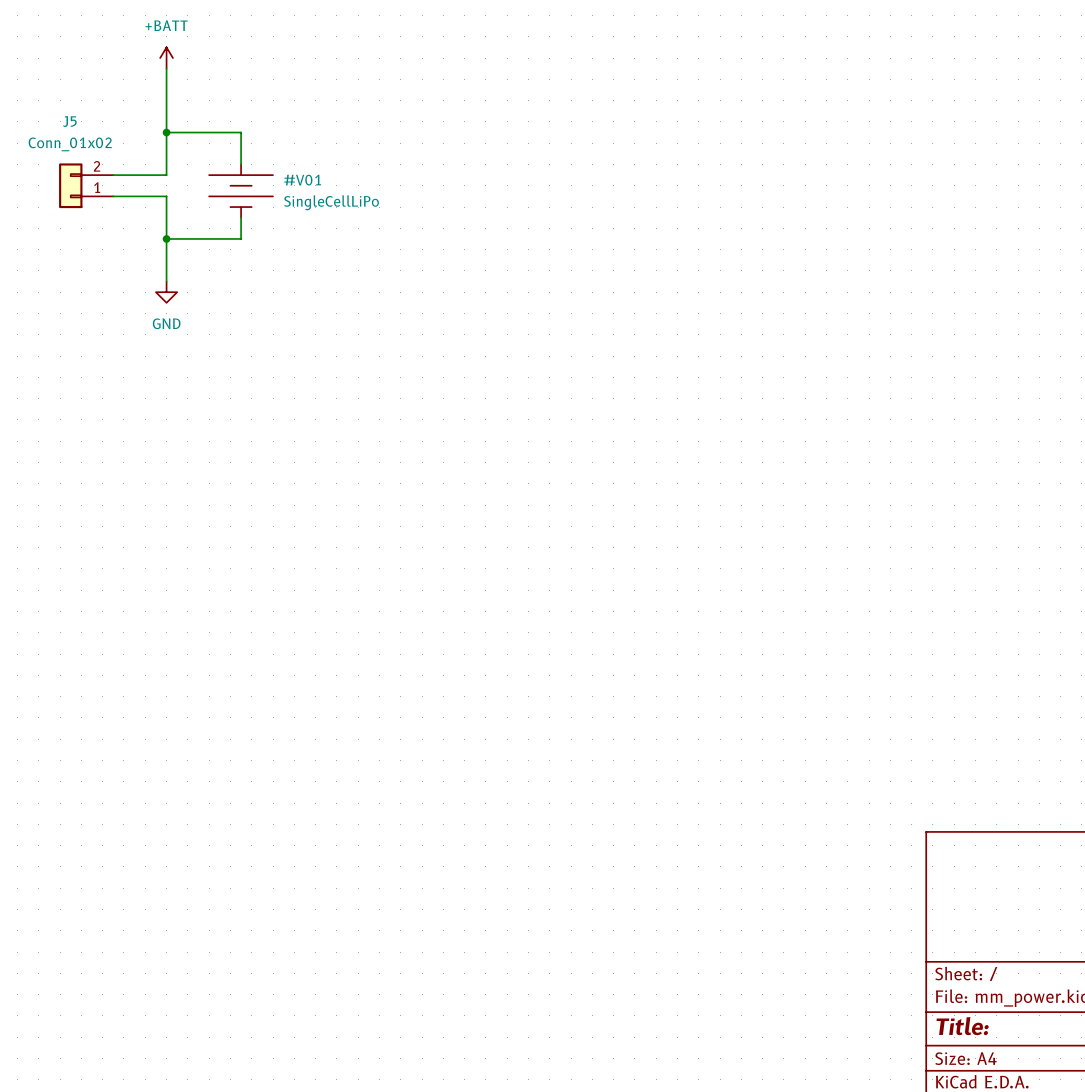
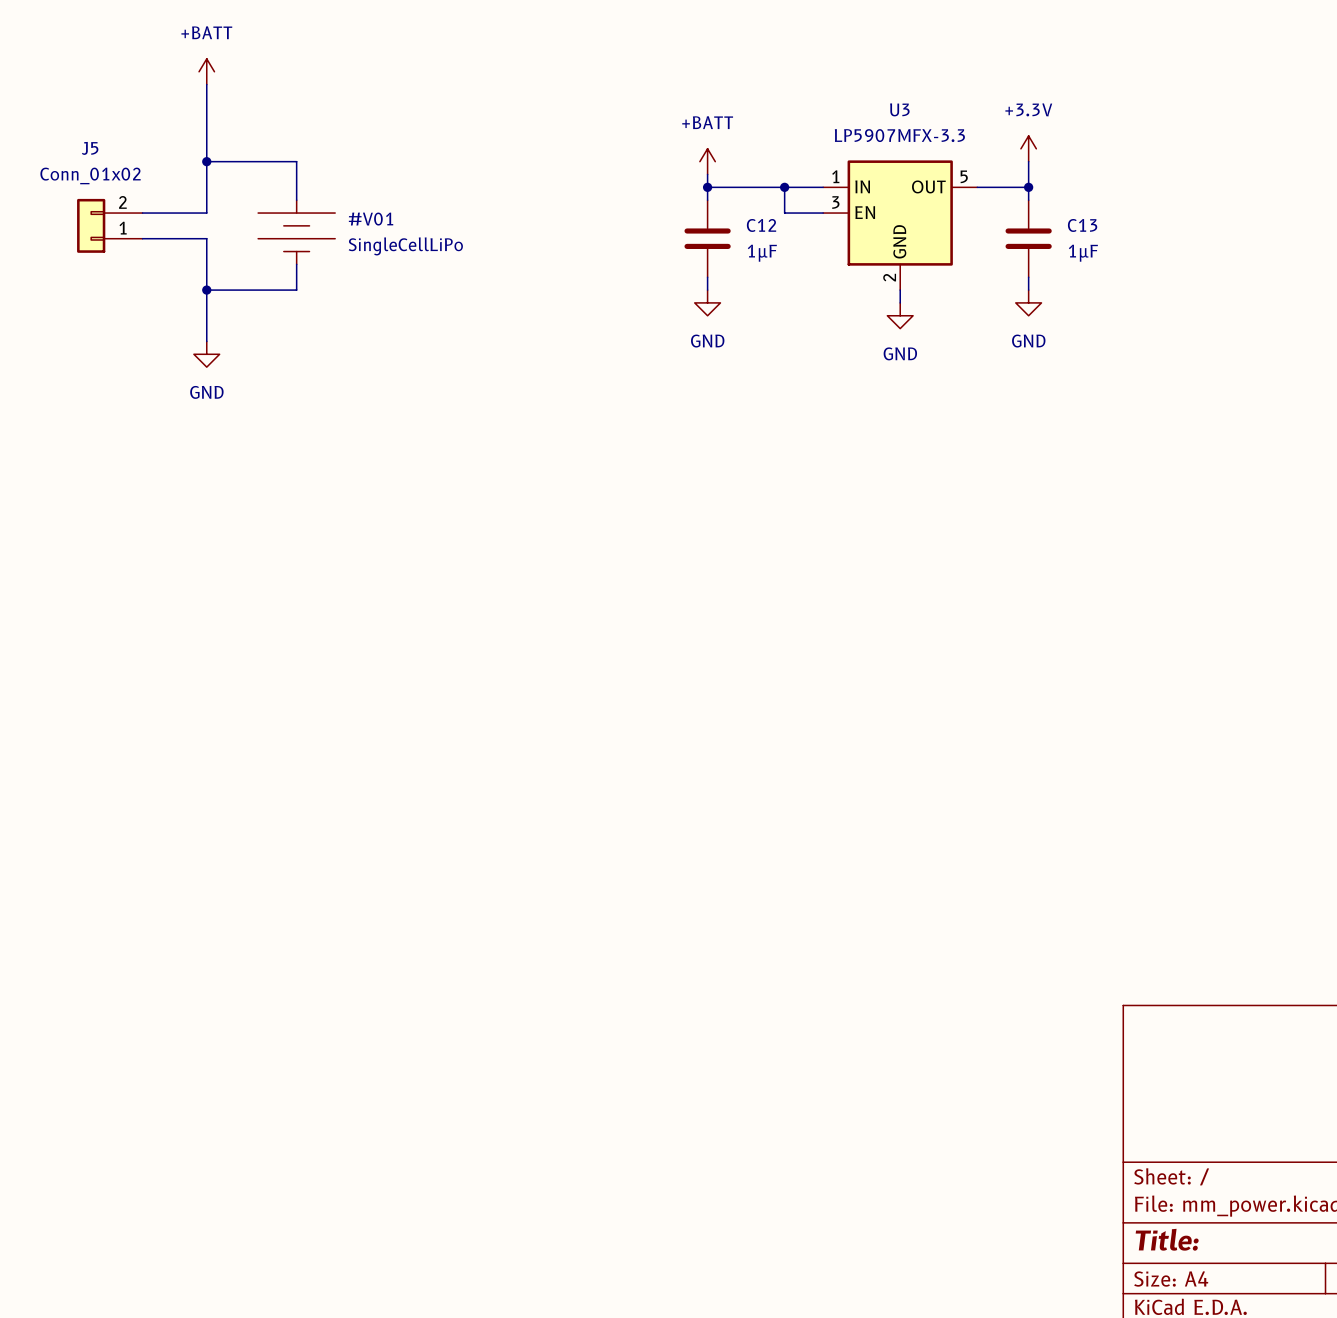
power symbol: none -> +3.3V (1028, 148)
power symbol: none -> +BATT (707, 161)
wire: none -> (1028, 161) (1028, 200)
wire: none -> (707, 174) (707, 200)
wire: none -> (707, 187) (823, 187)
junction: none -> (707, 187)
wire: none -> (784, 187) (784, 213) (823, 213)
junction: none -> (784, 187)
wire: none -> (977, 187) (1028, 187)
junction: none -> (1028, 187)
U3: none -> LP5907MFX-3.3 (900, 225)
C12: none -> 1µF (707, 238)
C13: none -> 1µF (1028, 238)
wire: none -> (707, 277) (707, 290)
wire: none -> (1028, 277) (1028, 290)
wire: none -> (900, 290) (900, 302)
power symbol: none -> GND (707, 302)
power symbol: none -> GND (1028, 302)
power symbol: none -> GND (900, 315)

